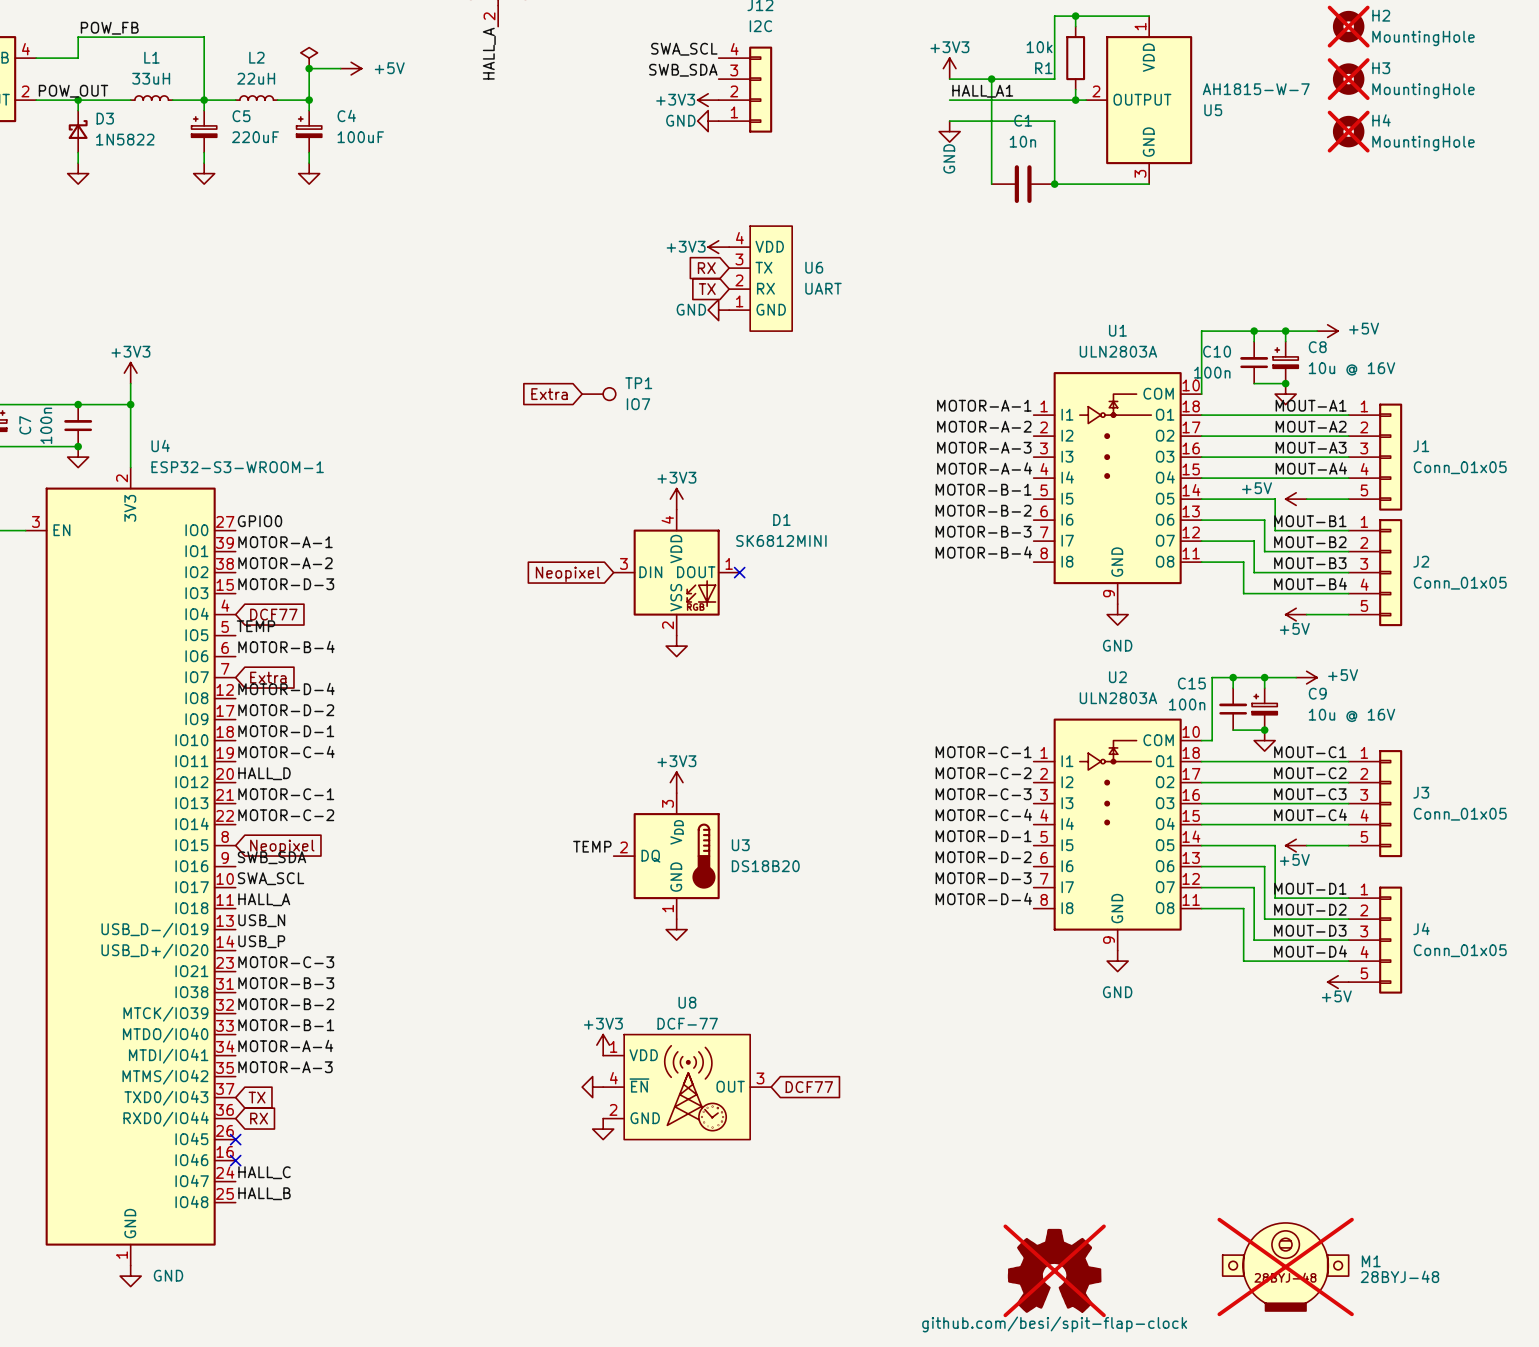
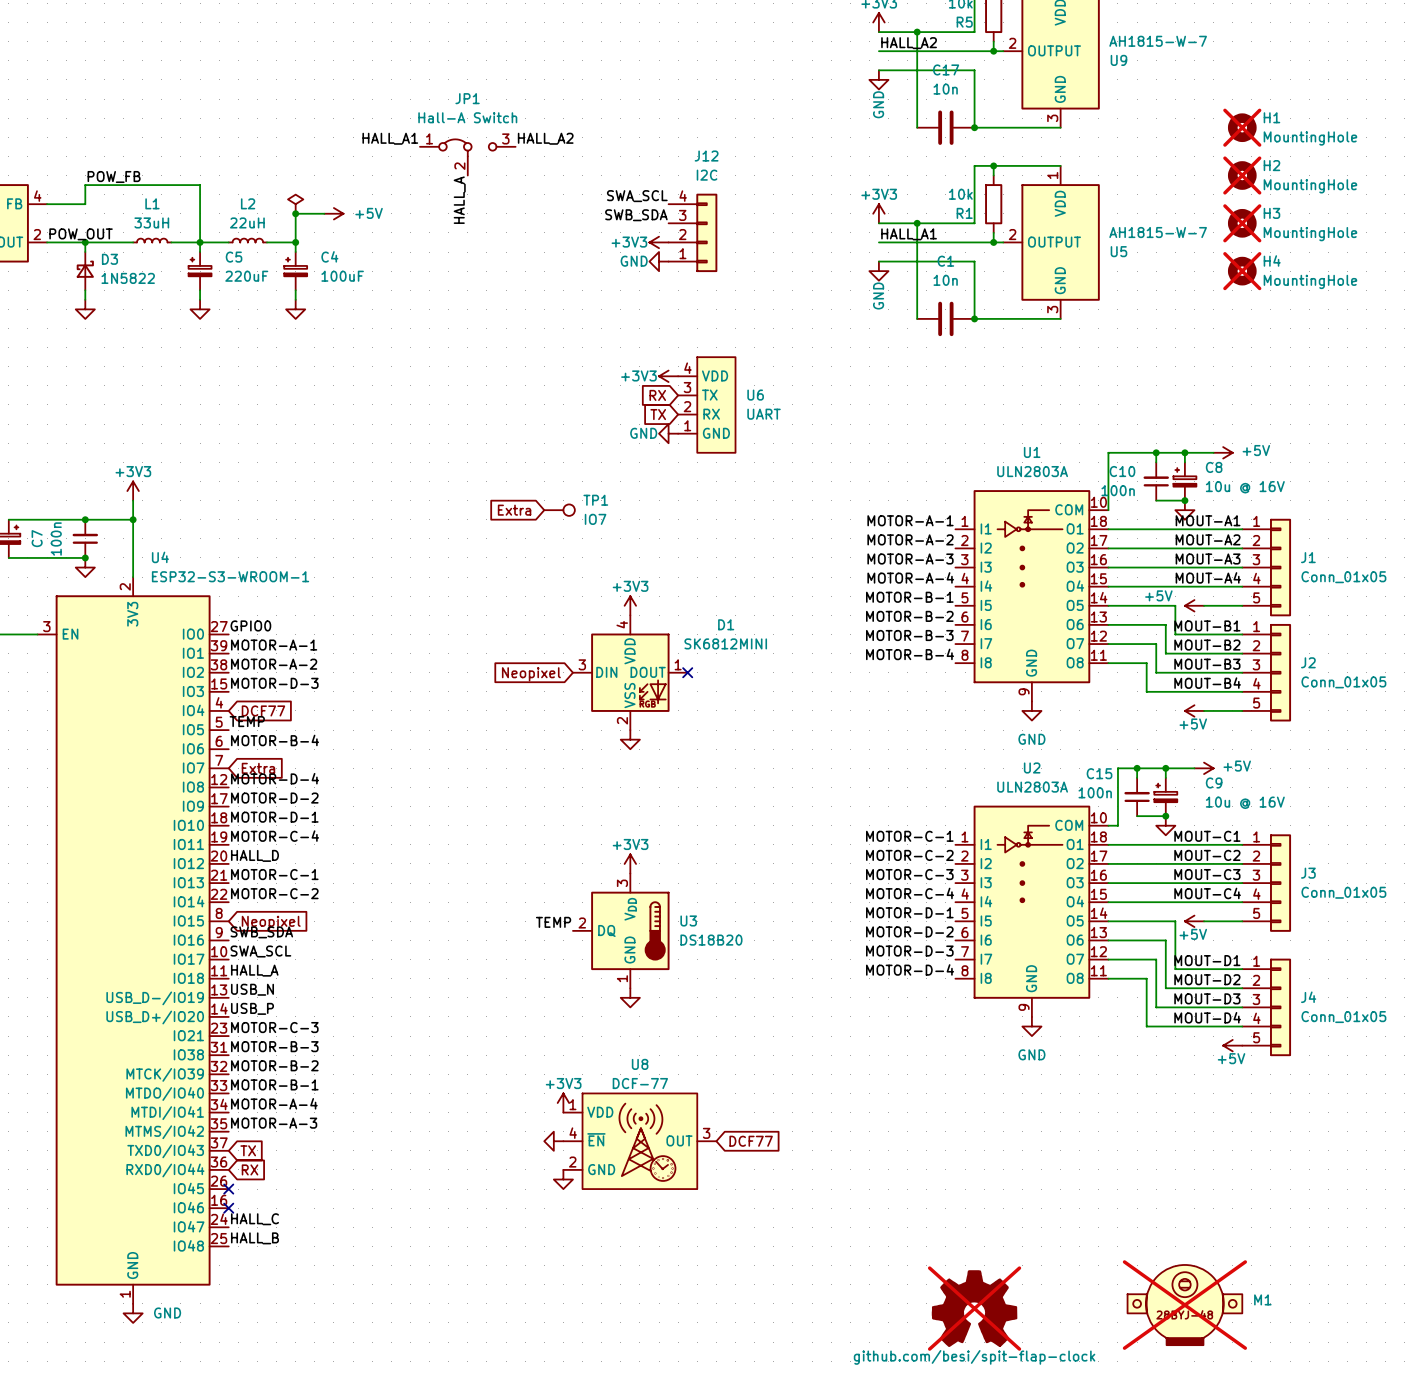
M1 value: 28BYJ-48 (1399, 1276) -> none

